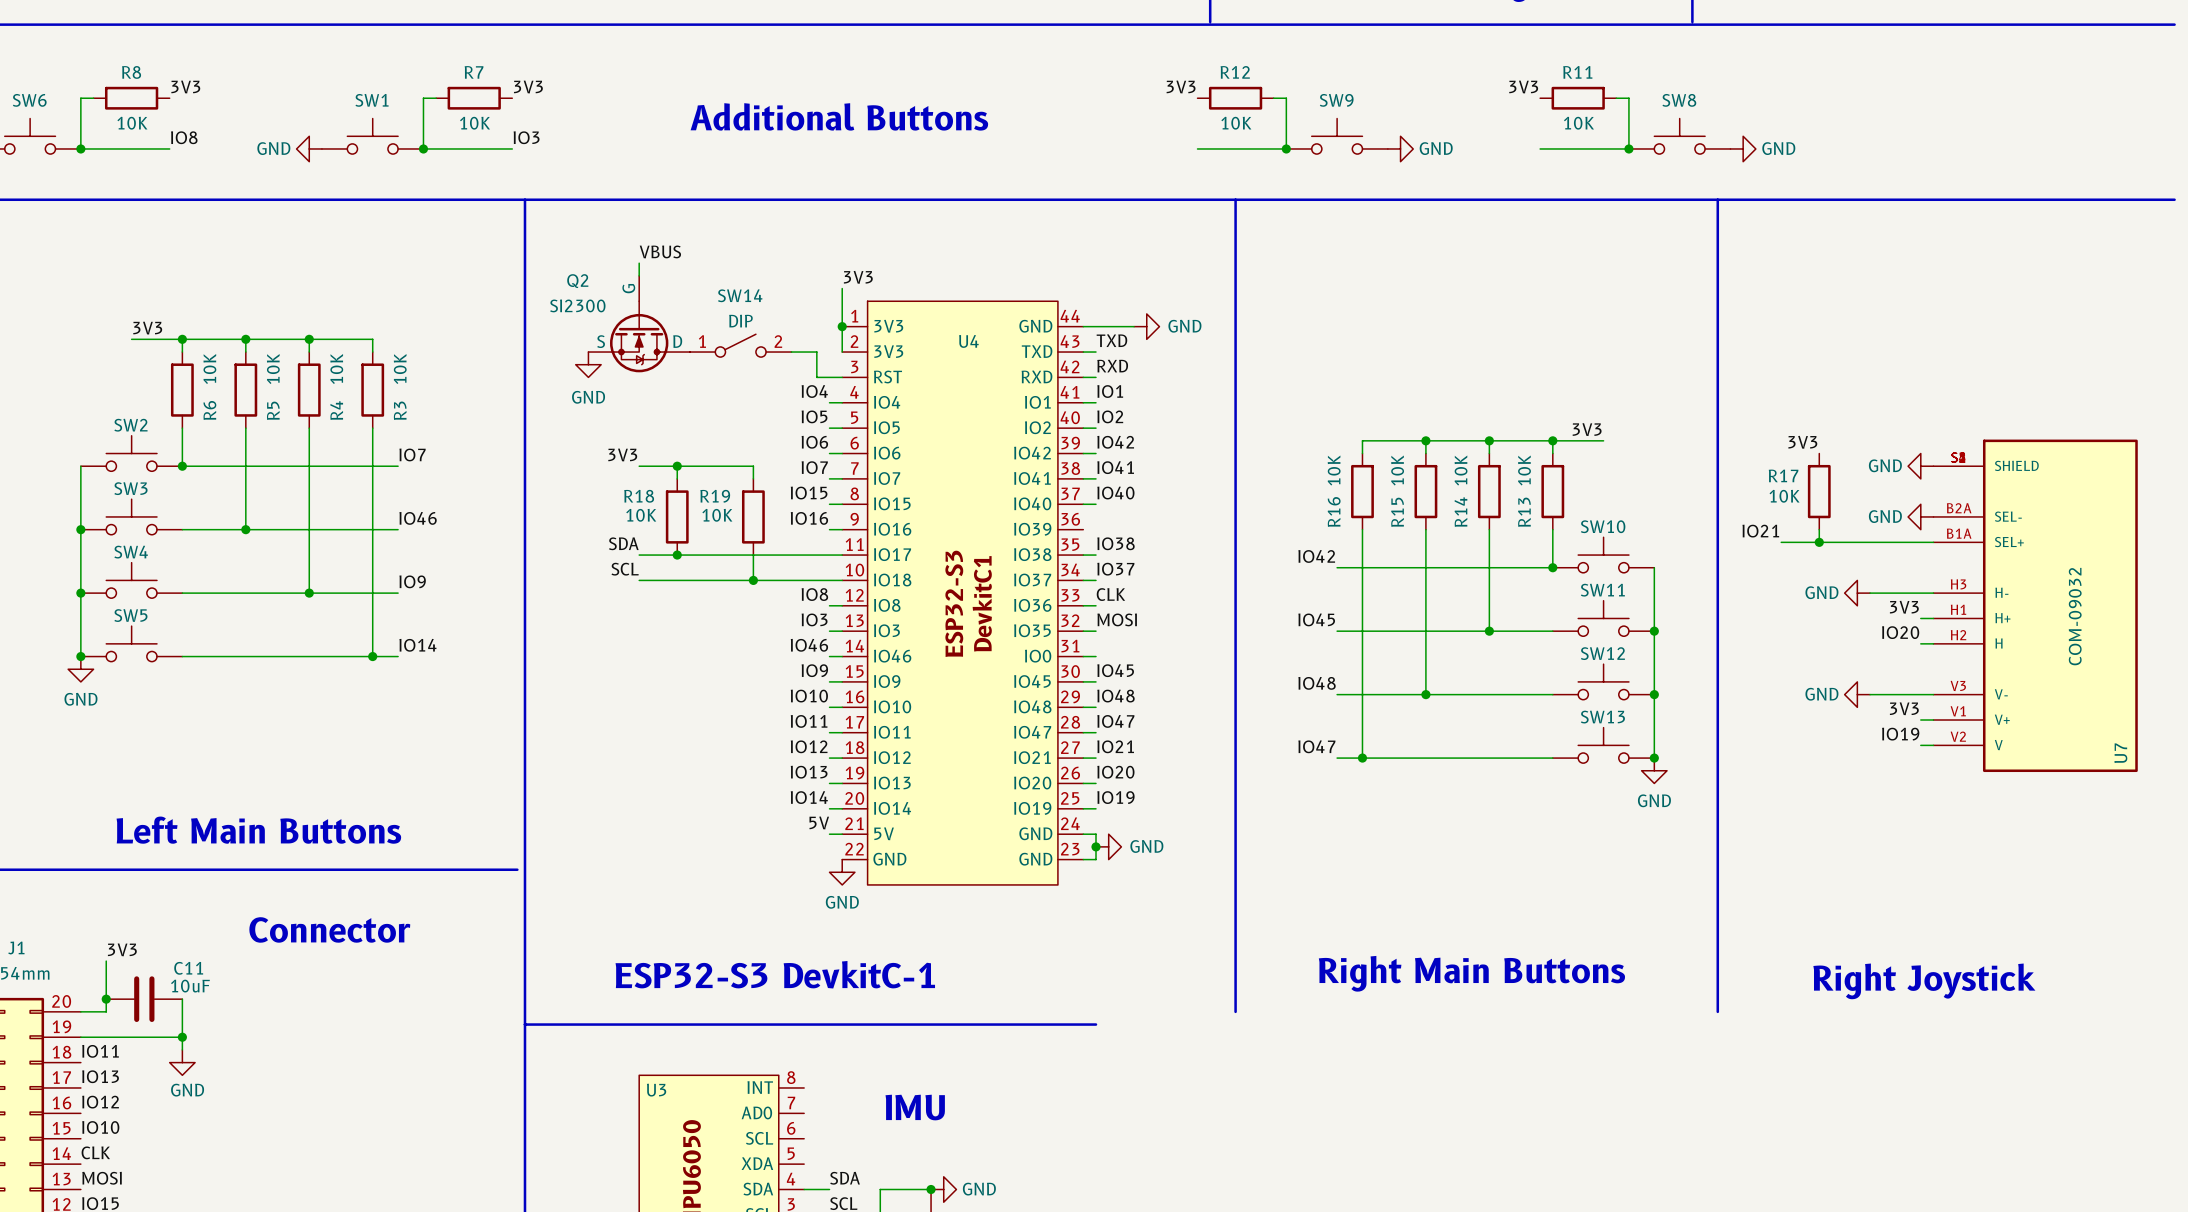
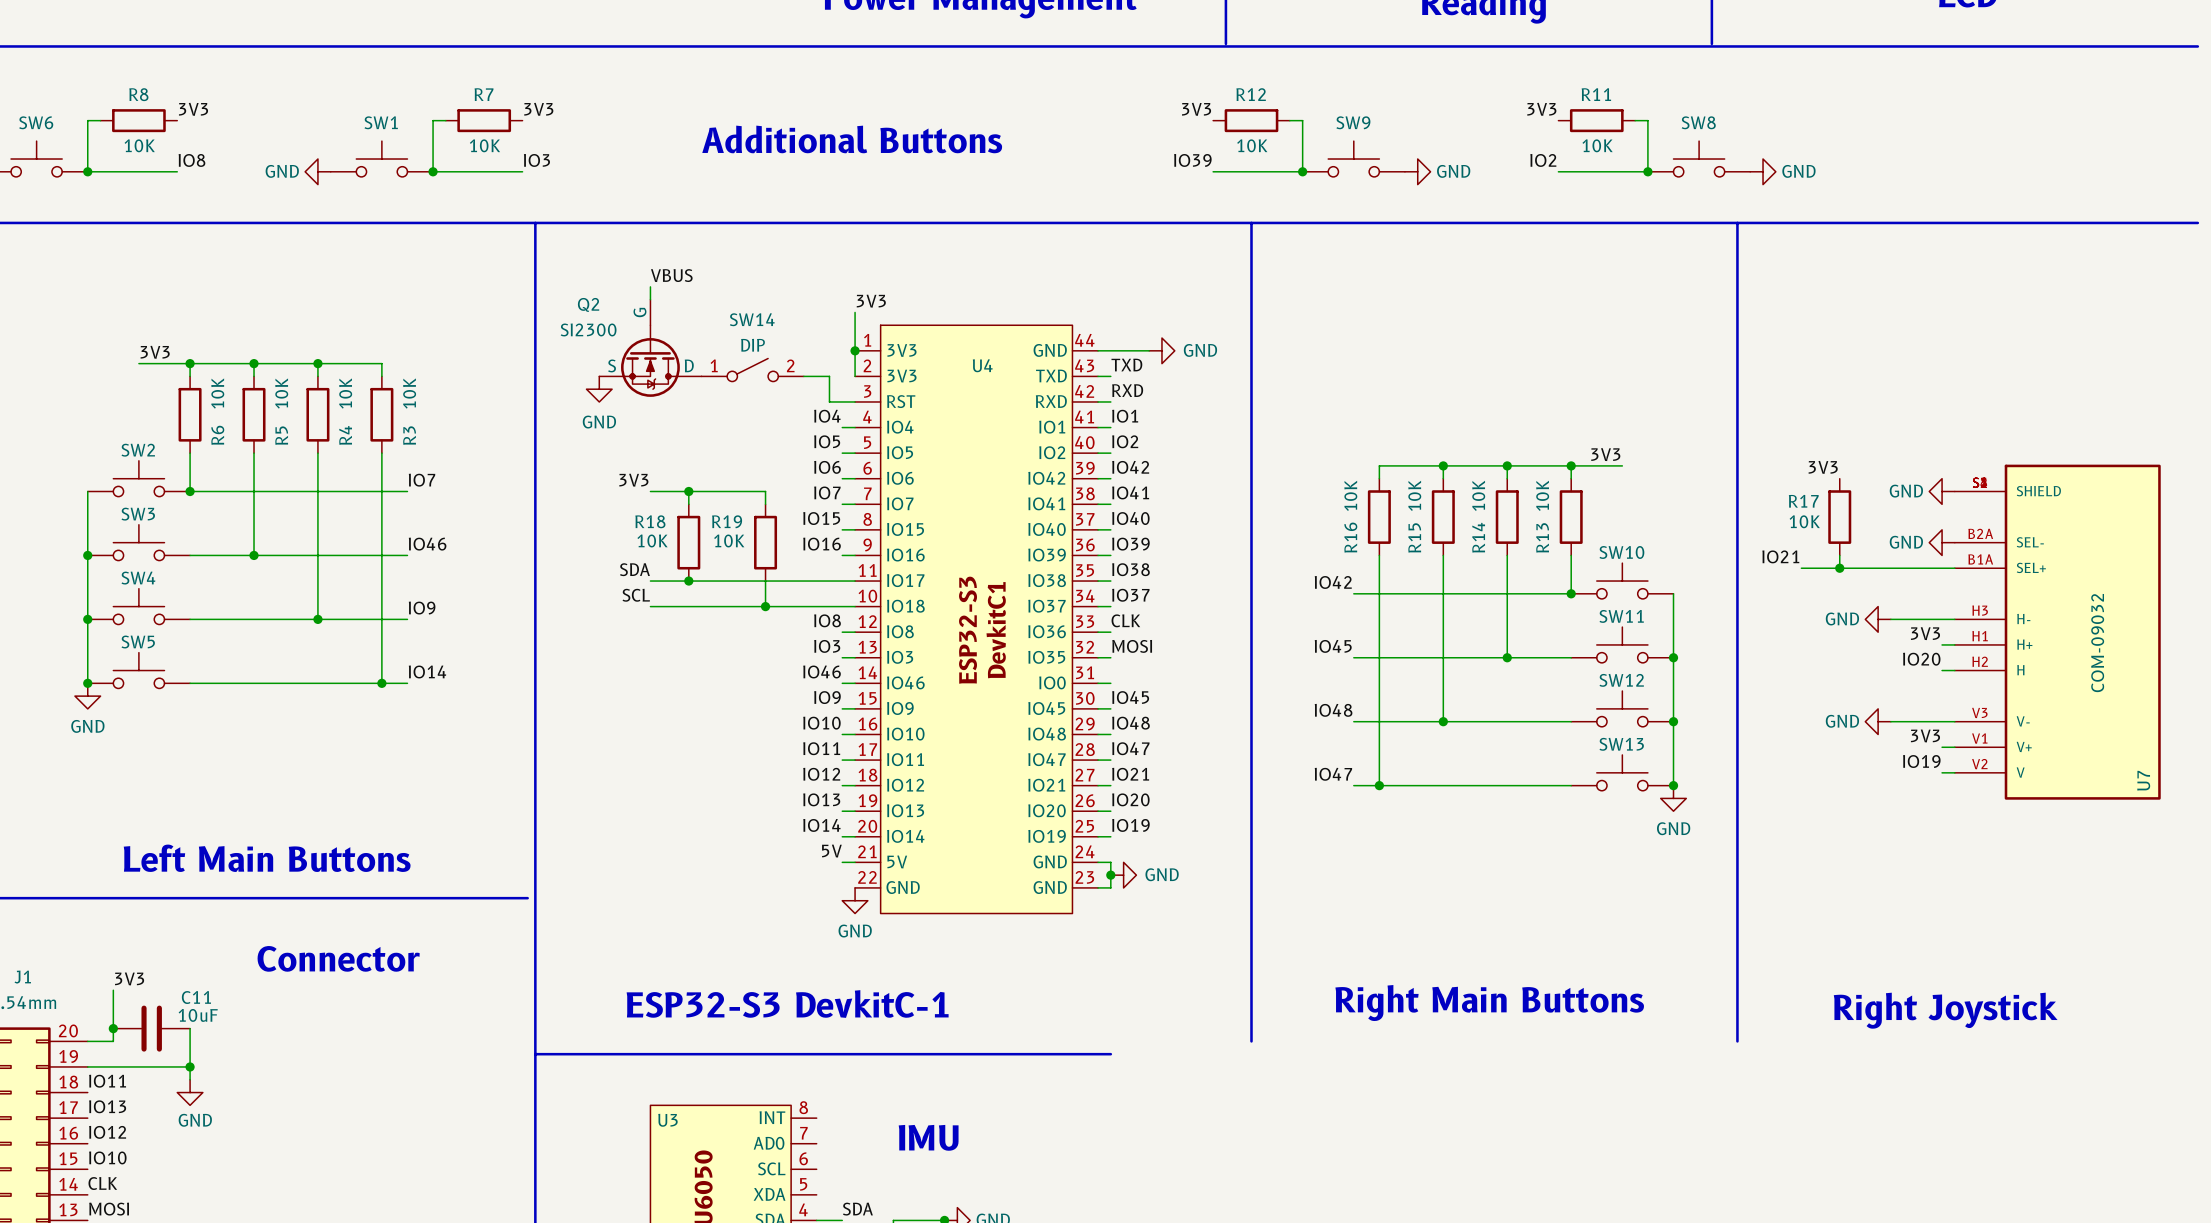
label: none -> IO39 (1192, 160)
label: none -> IO2 (1543, 160)
label: none -> IO39 (1130, 544)
wire: none -> (1098, 555) (1110, 555)

